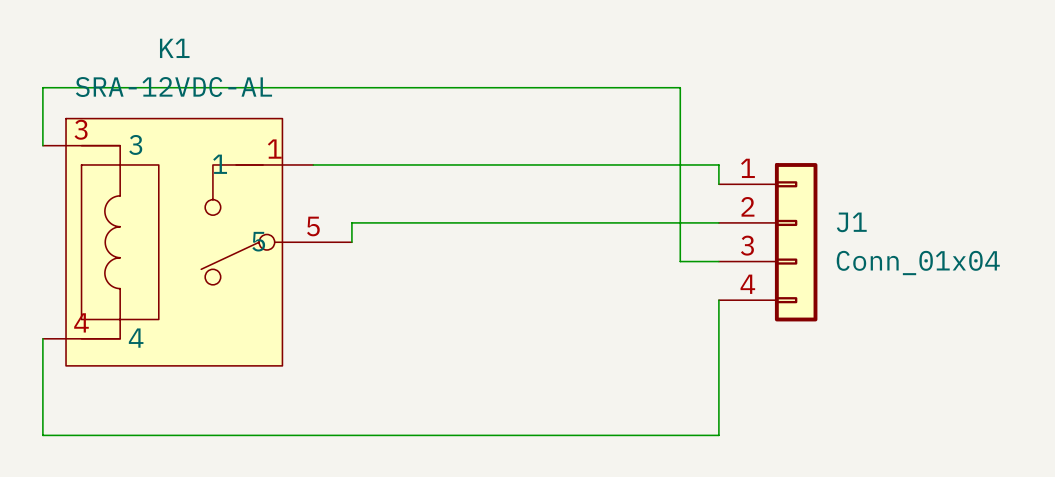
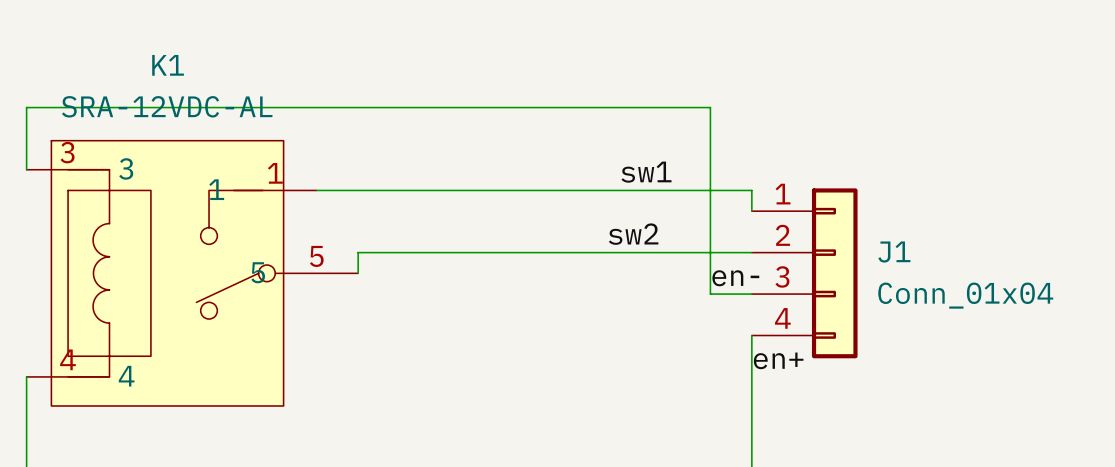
label: none -> sw1 (646, 172)
label: none -> sw2 (633, 234)
label: none -> en- (735, 278)
label: none -> en+ (778, 360)

